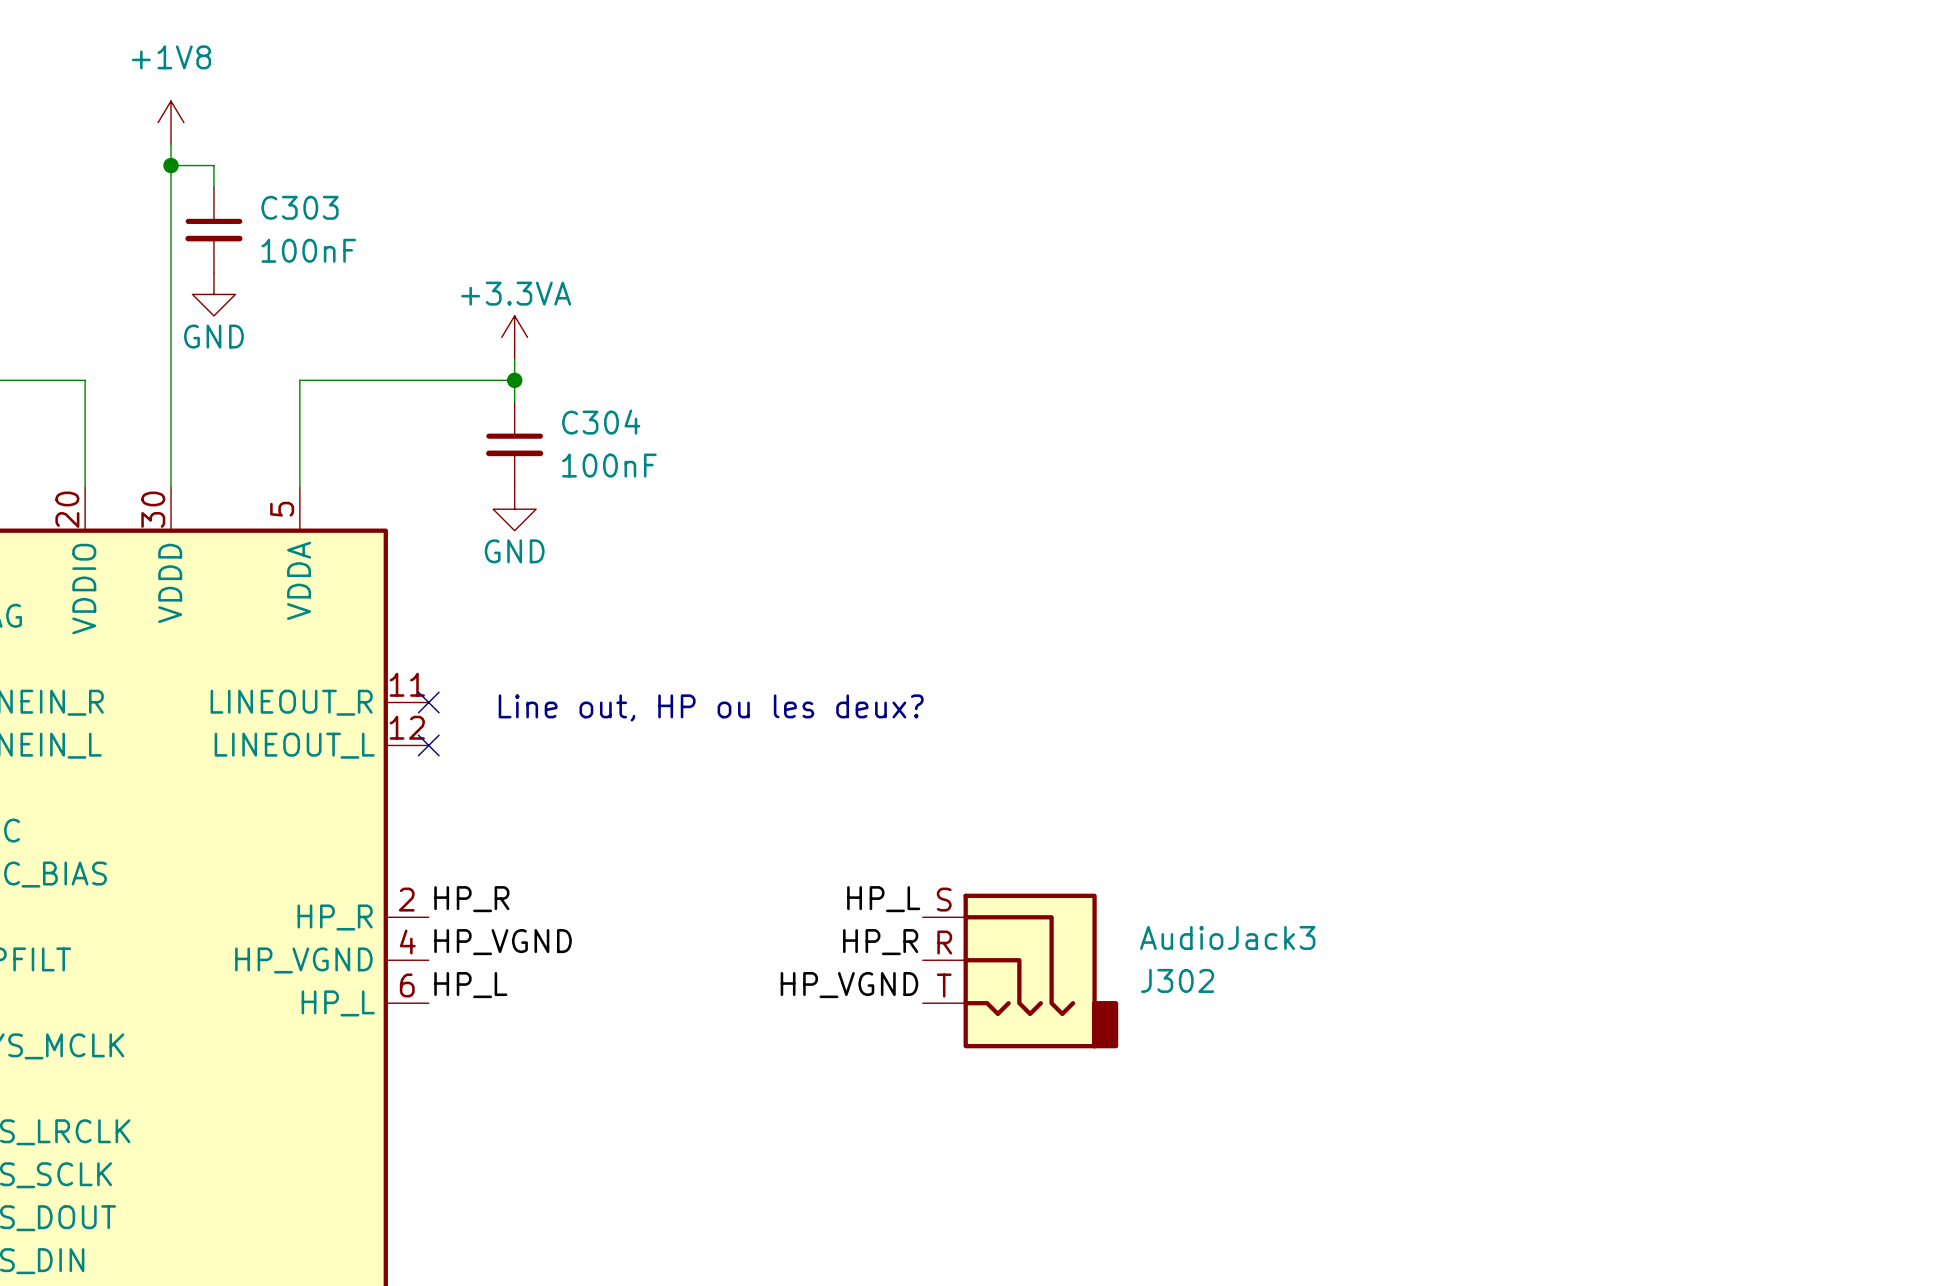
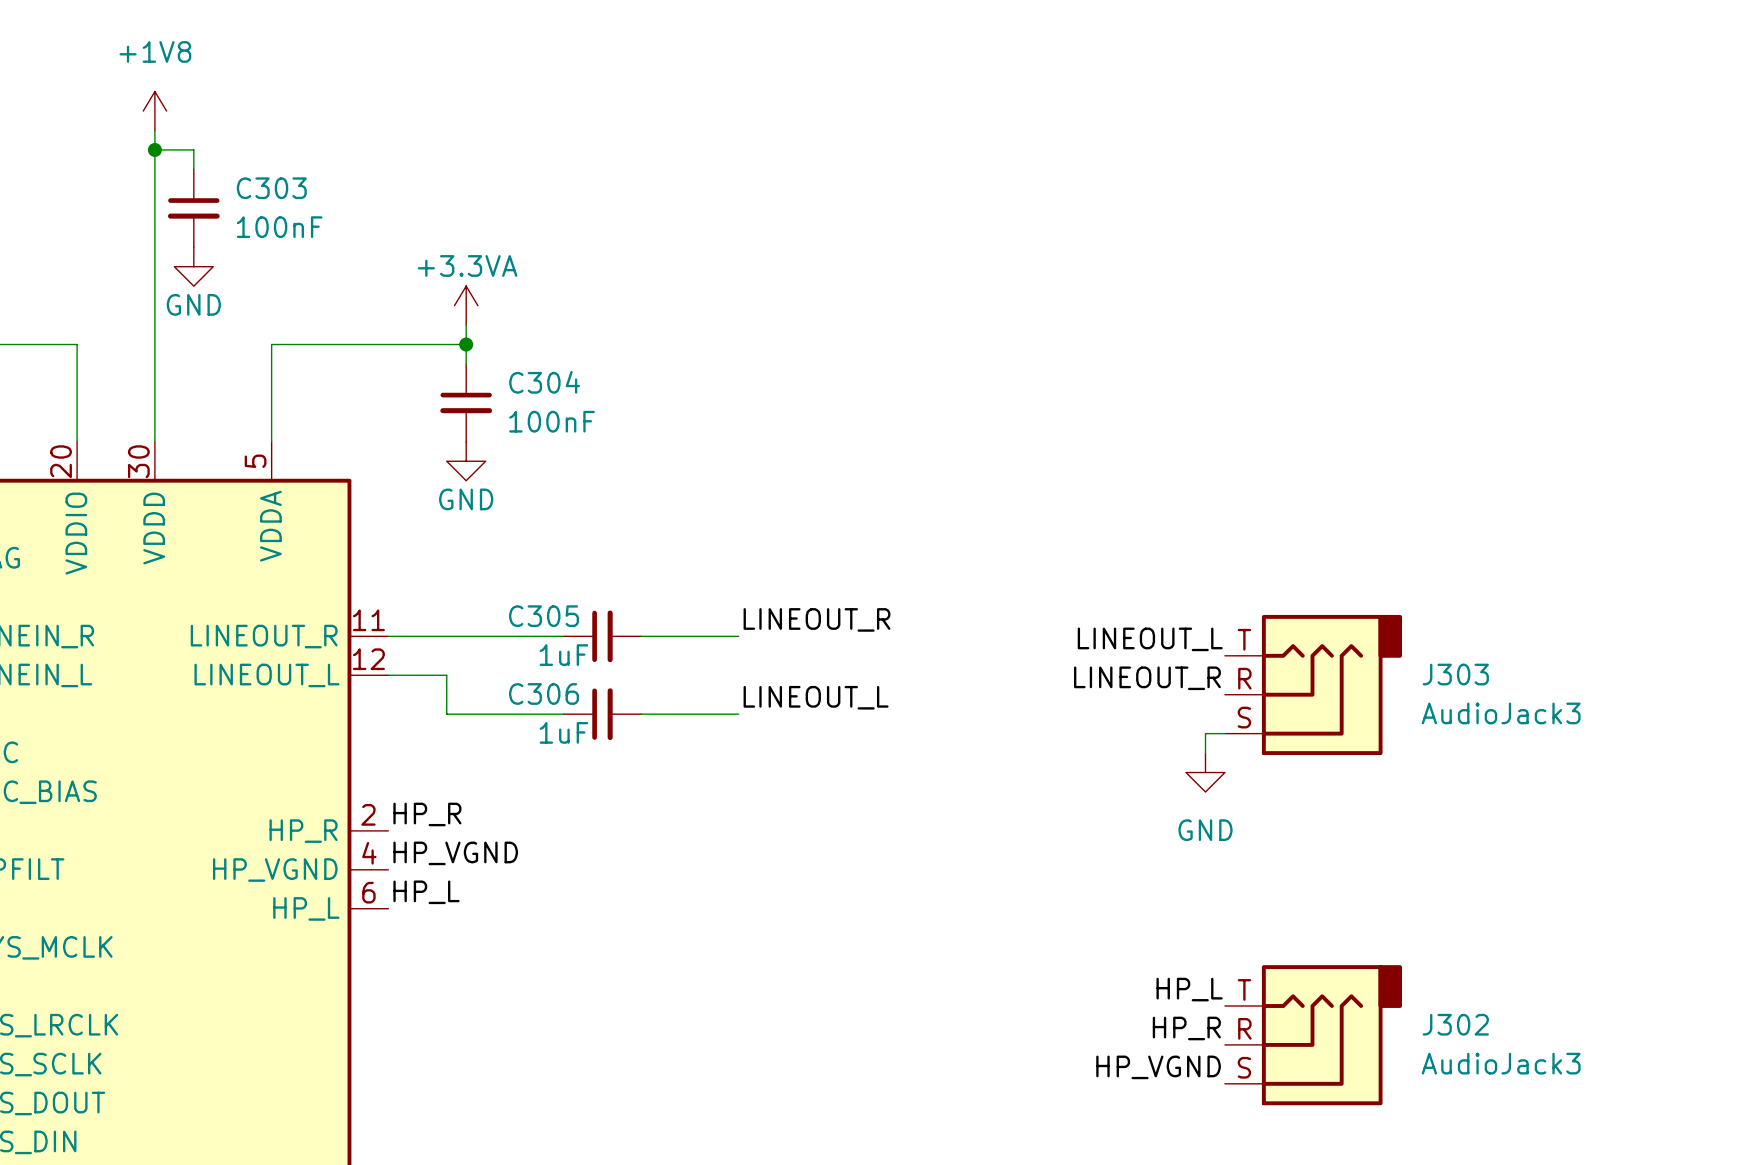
label: none -> LINEOUT_R (816, 619)
wire: none -> (388, 636) (563, 636)
no-connect mark: (428, 702) -> none
C305: none -> 1uF (602, 636)
wire: none -> (641, 636) (738, 636)
label: none -> LINEOUT_L (1150, 639)
text: Line out, HP ou les deux? (711, 707) -> none
wire: none -> (388, 675) (446, 675) (446, 714) (563, 714)
no-connect mark: (428, 745) -> none
label: none -> LINEOUT_R (1147, 678)
J303: none -> AudioJack3 (1313, 684)
label: none -> LINEOUT_L (816, 697)
C306: none -> 1uF (602, 714)
wire: none -> (641, 714) (738, 714)
wire: none -> (1224, 733) (1205, 733) (1205, 753)
power symbol: none -> GND (1205, 772)
label: HP_L (883, 899) -> none
label: HP_R (880, 942) -> none
J302 position: (1020, 970) -> (1313, 1035)
J302 flip: as is (1040, 970) -> up-down (1331, 1035)
label: HP_VGND (849, 985) -> none
label: none -> HP_L (1189, 989)
label: none -> HP_R (1186, 1028)
label: none -> HP_VGND (1158, 1067)

